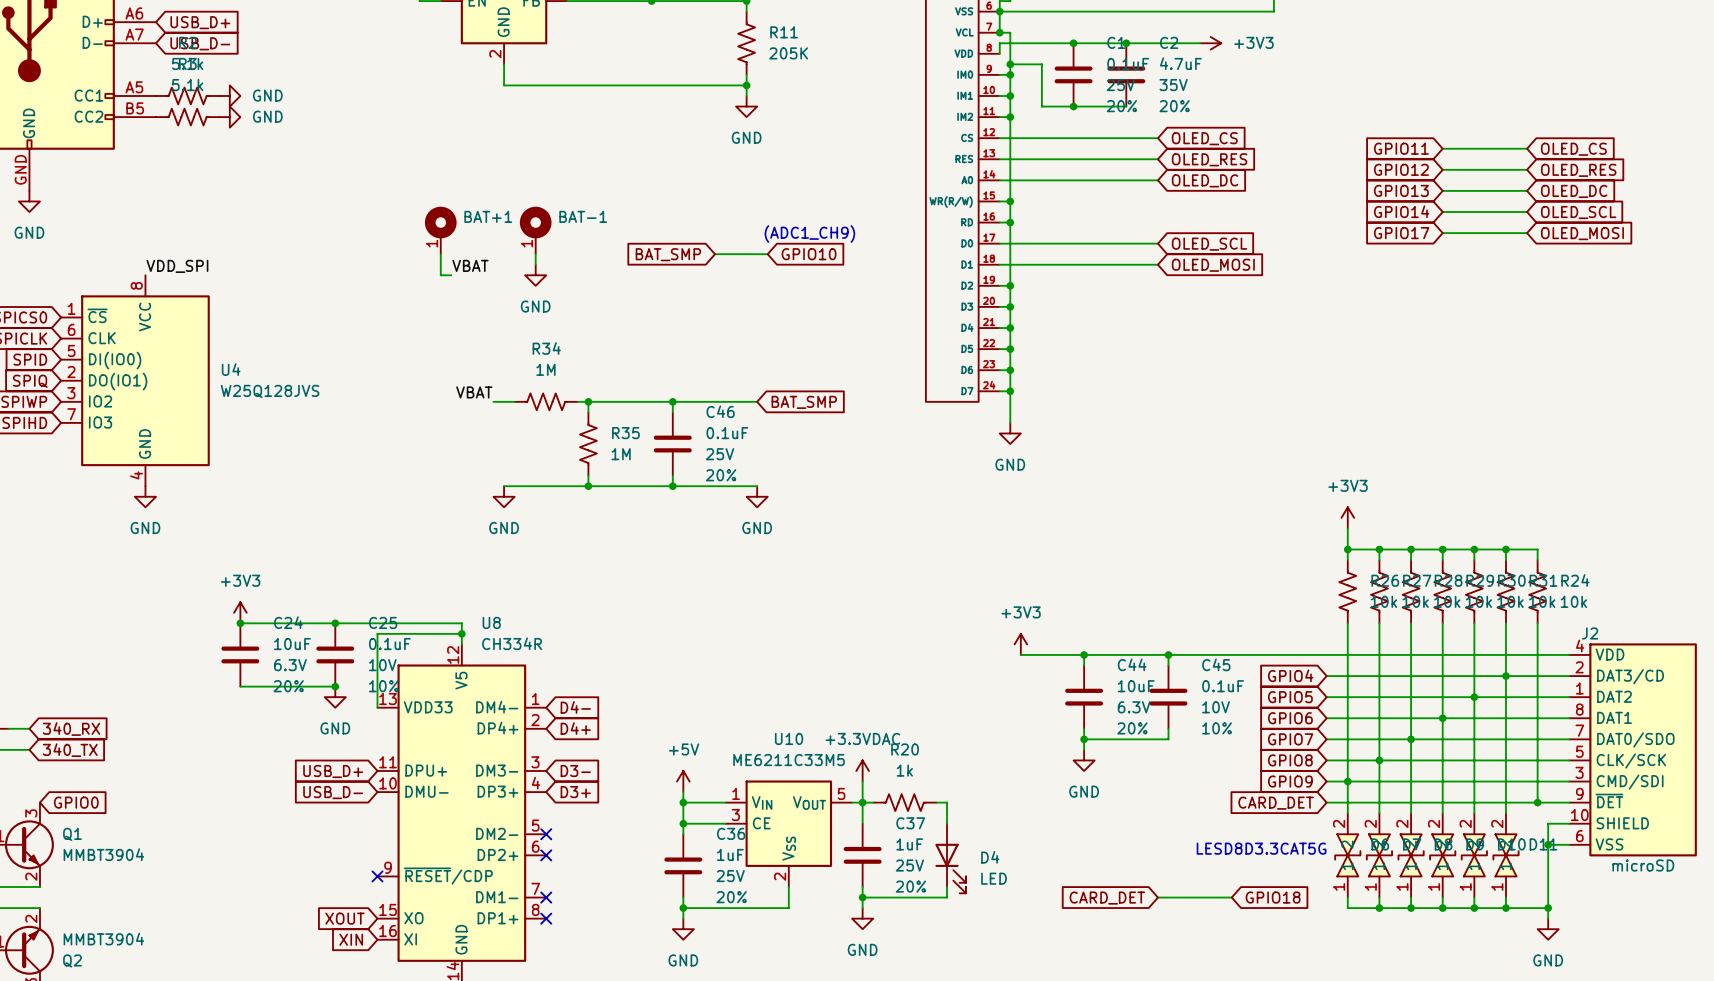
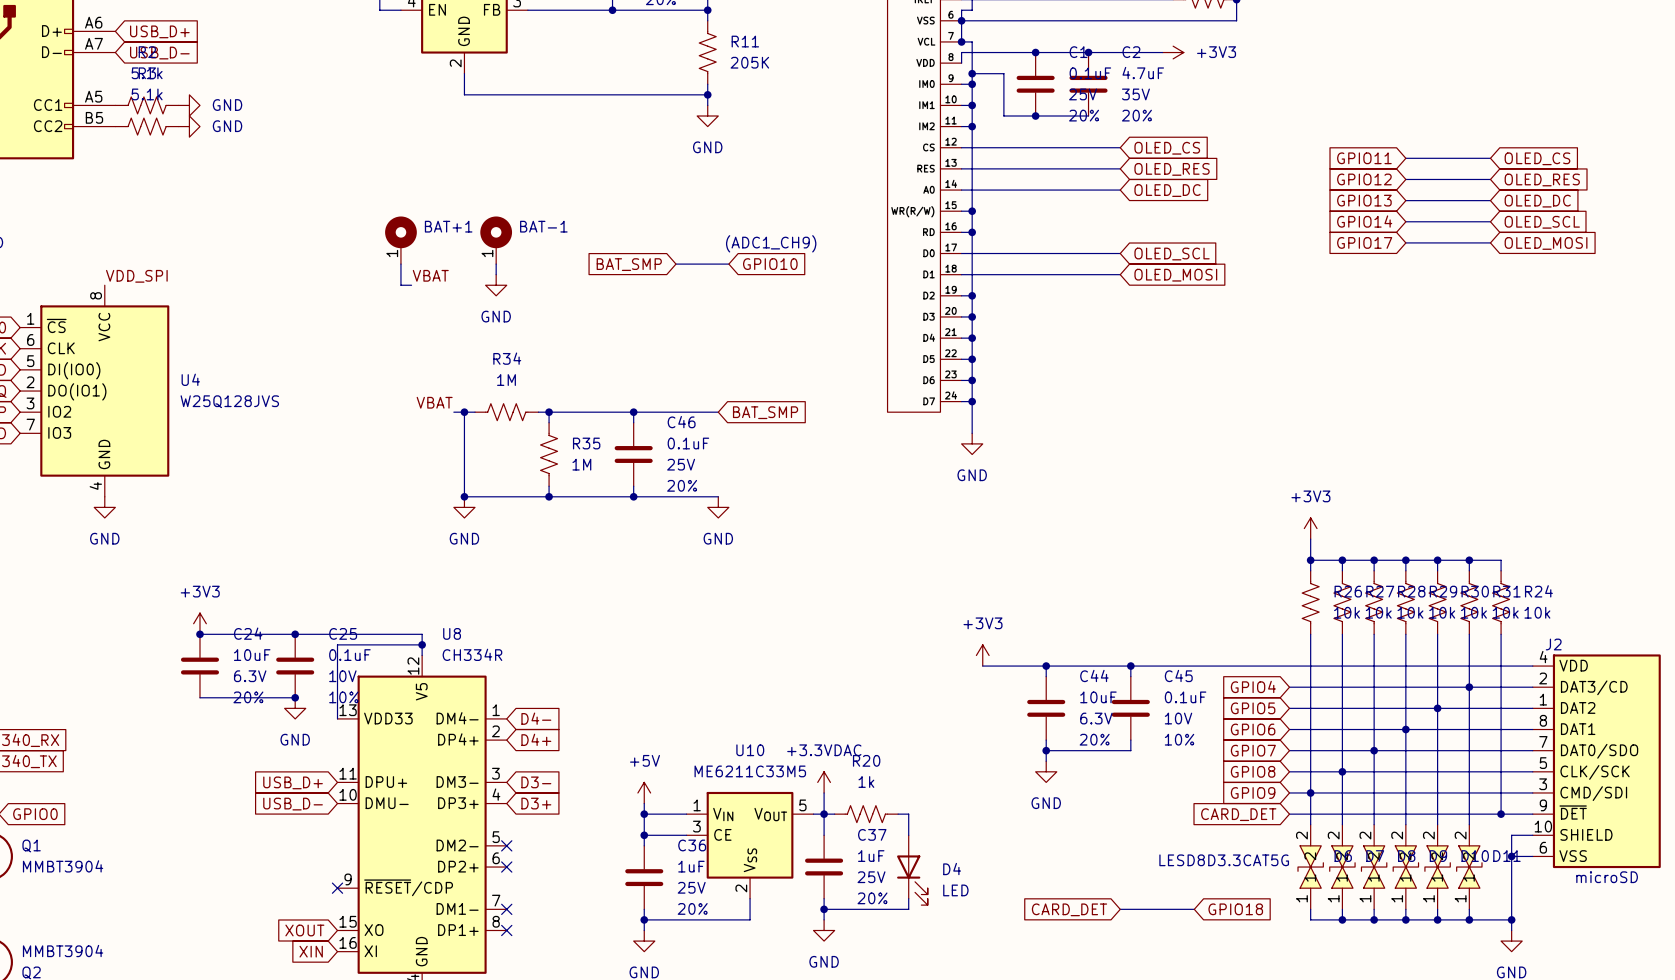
wire: none -> (464, 412) (464, 496)
junction: none -> (464, 412)
junction: none -> (464, 496)

